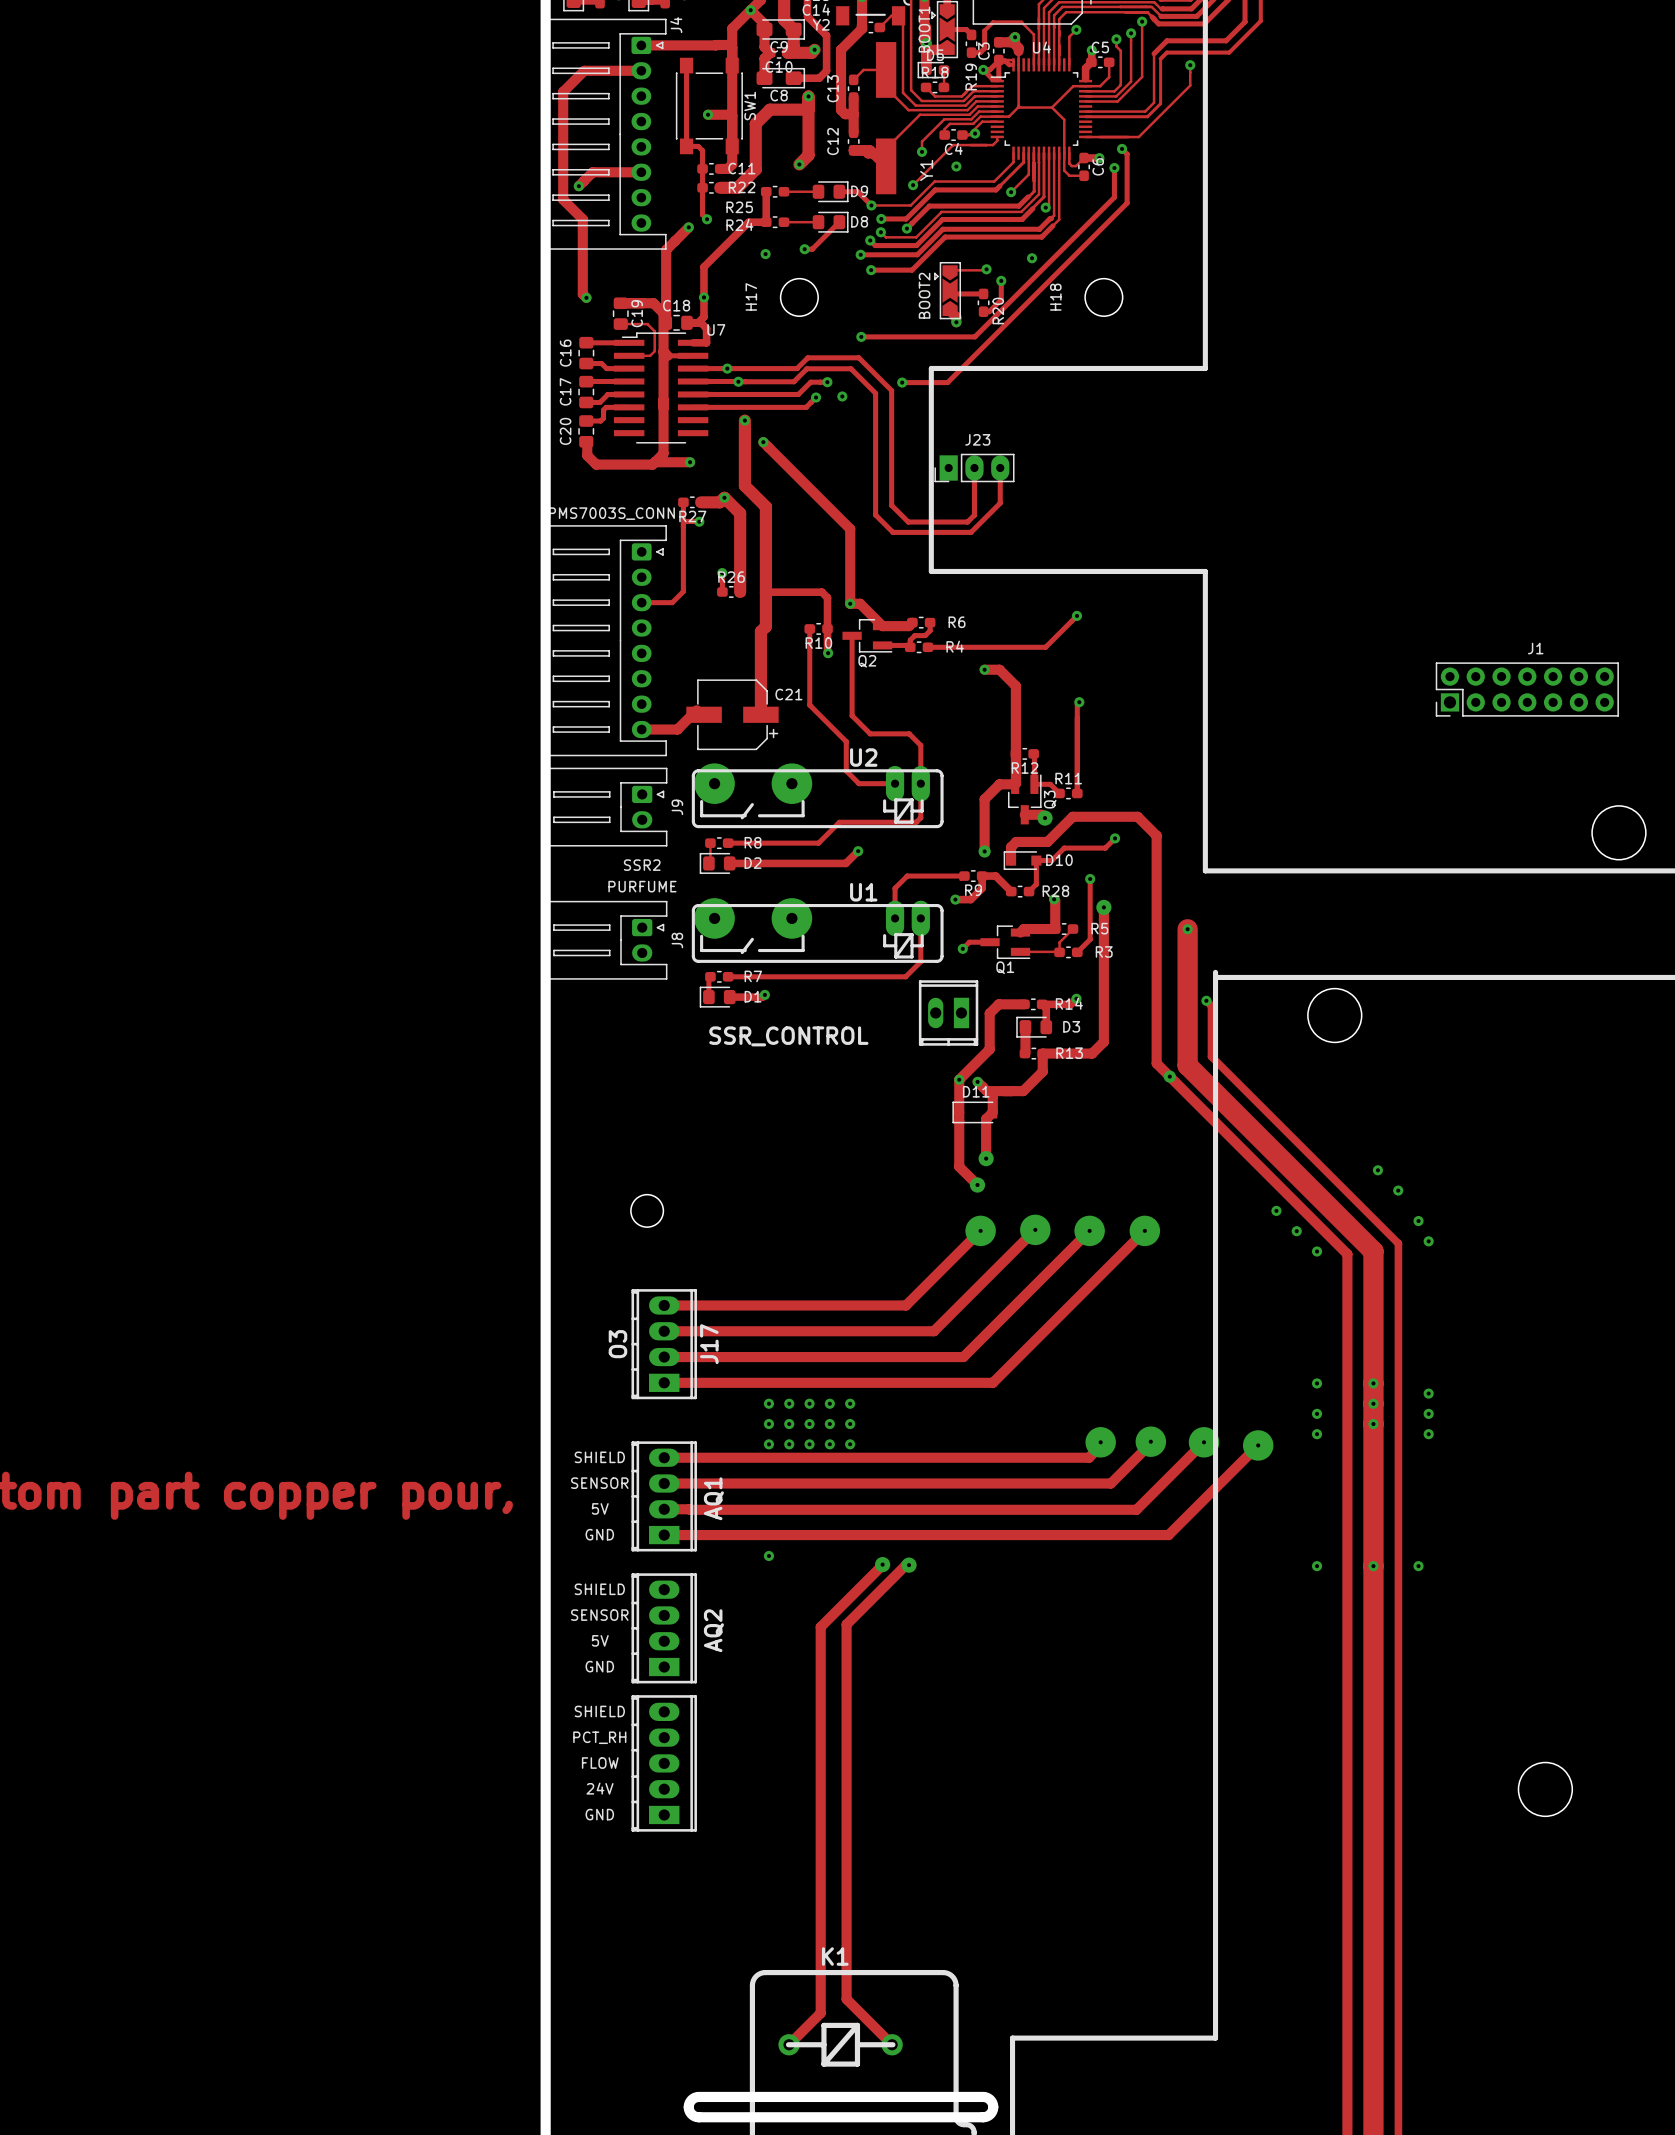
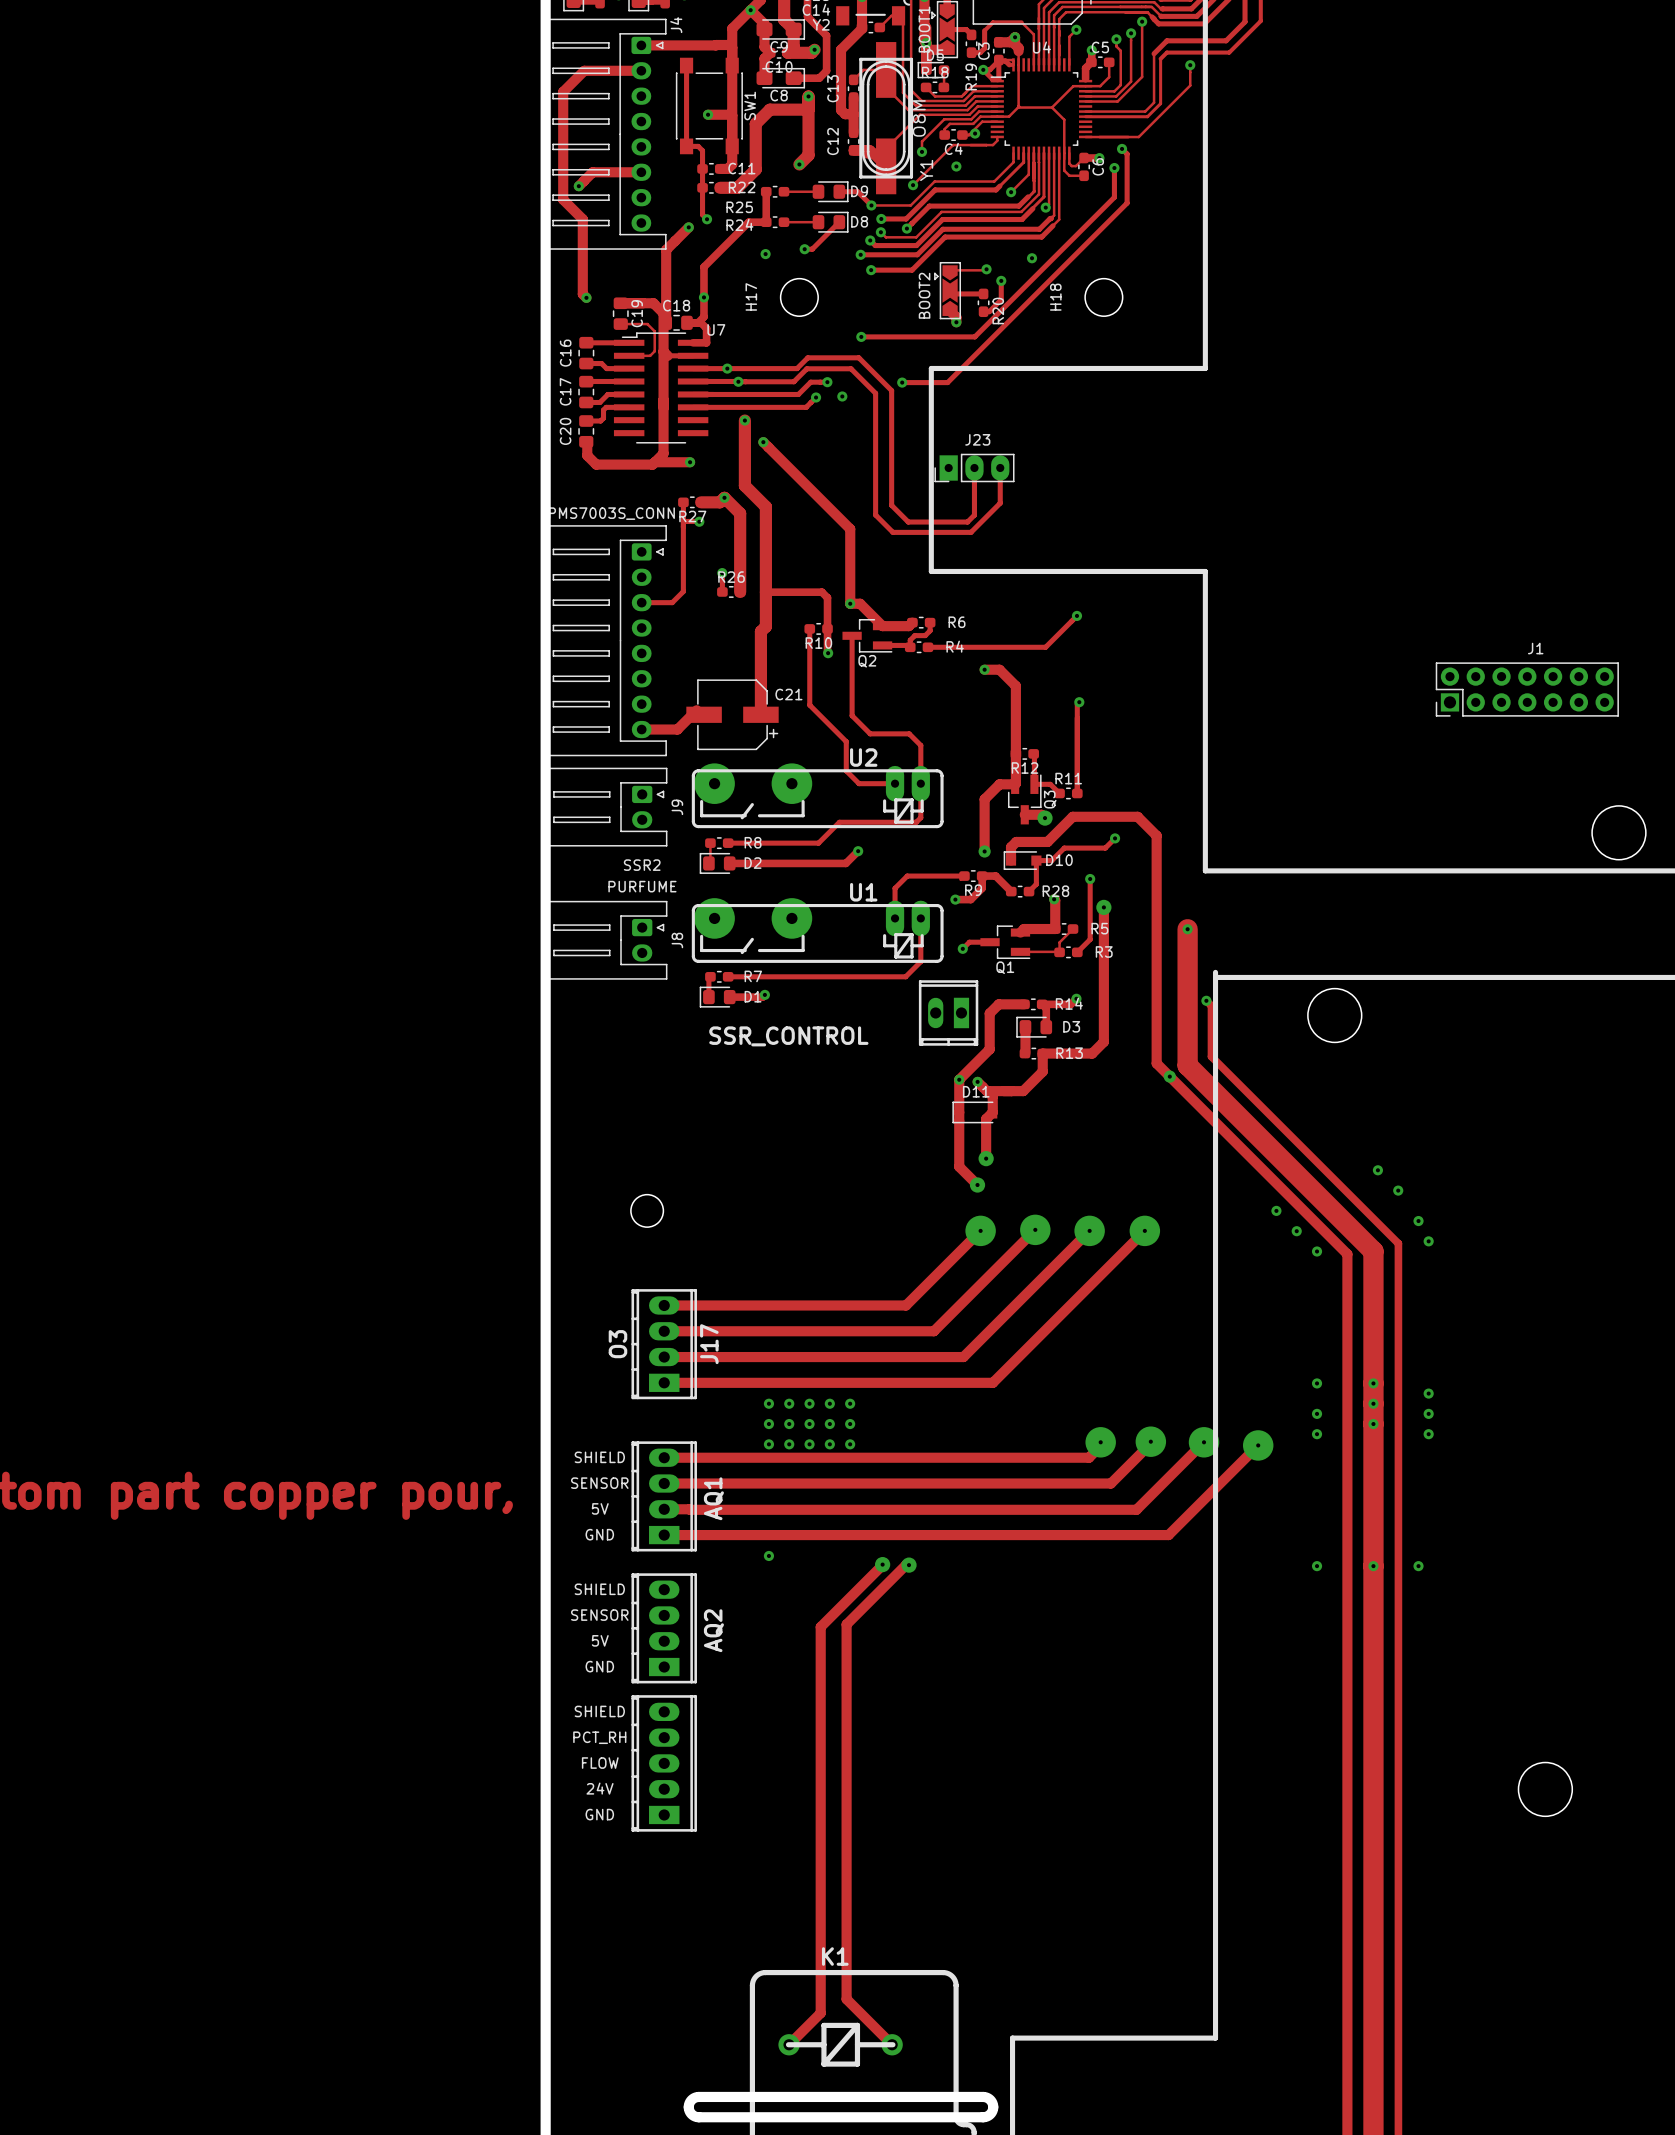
Y1 footprint: [876, 42, 897, 195] -> [859, 42, 914, 195]
Y1 value: none -> O8M (919, 118)

